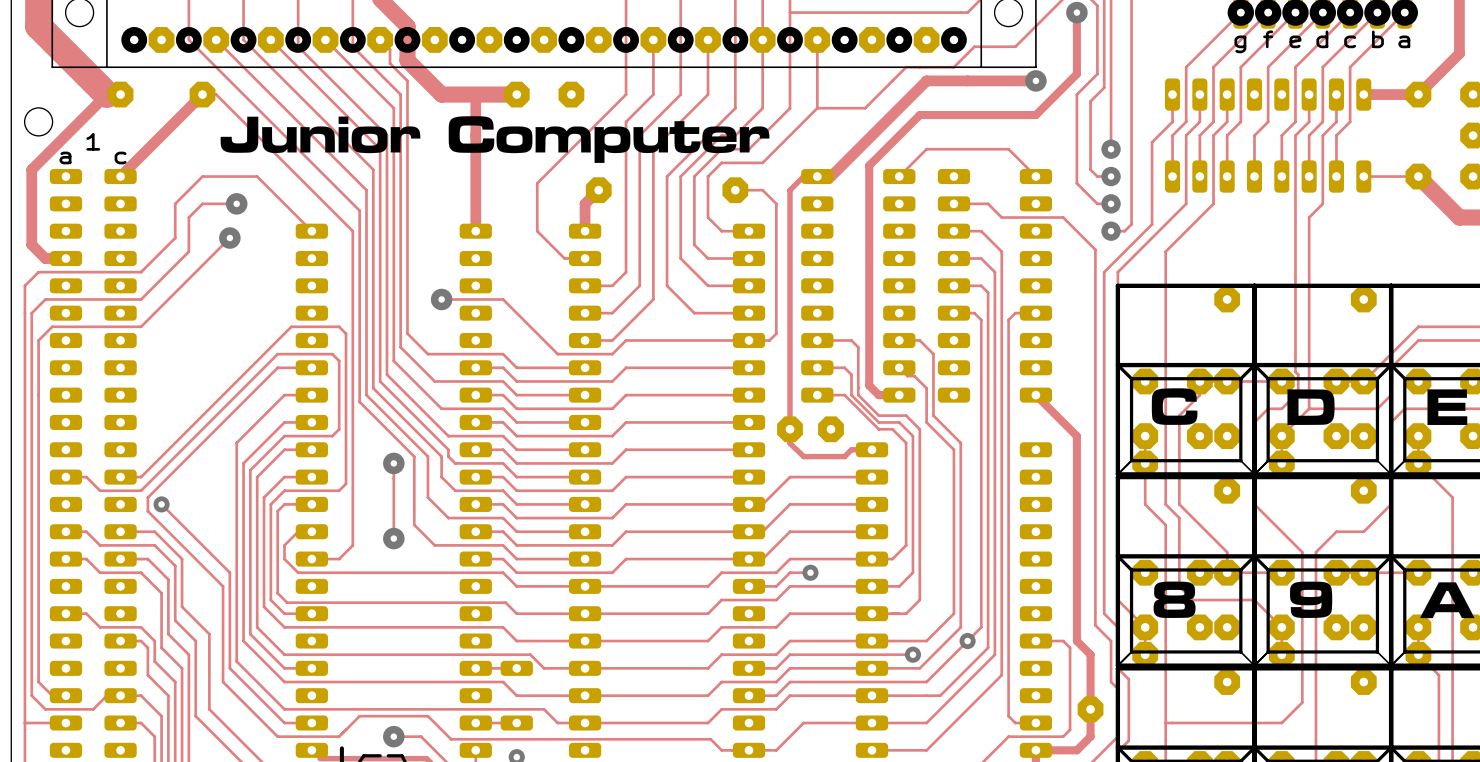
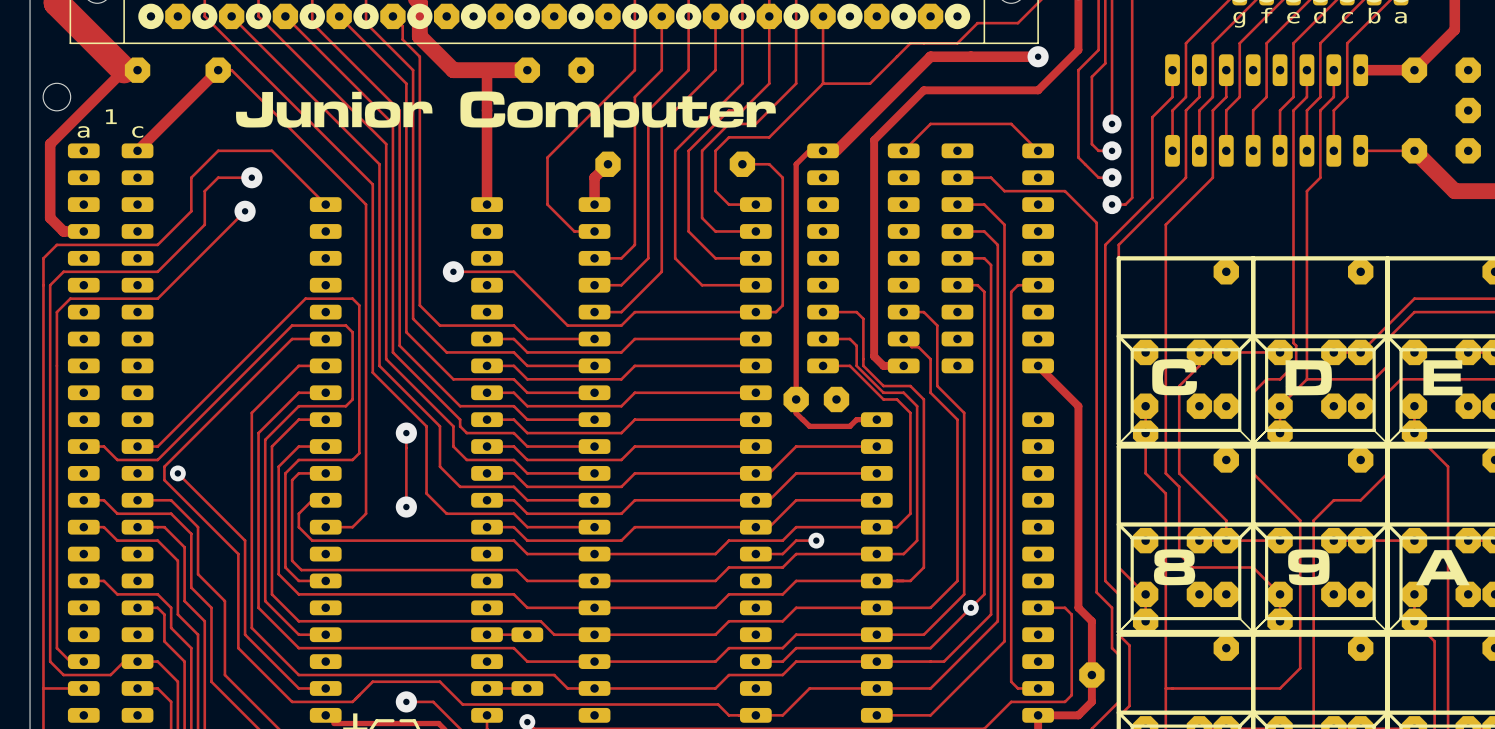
track: (912, 654) (790, 654) (776, 668) (749, 668) -> none
via: (912, 654) -> none

